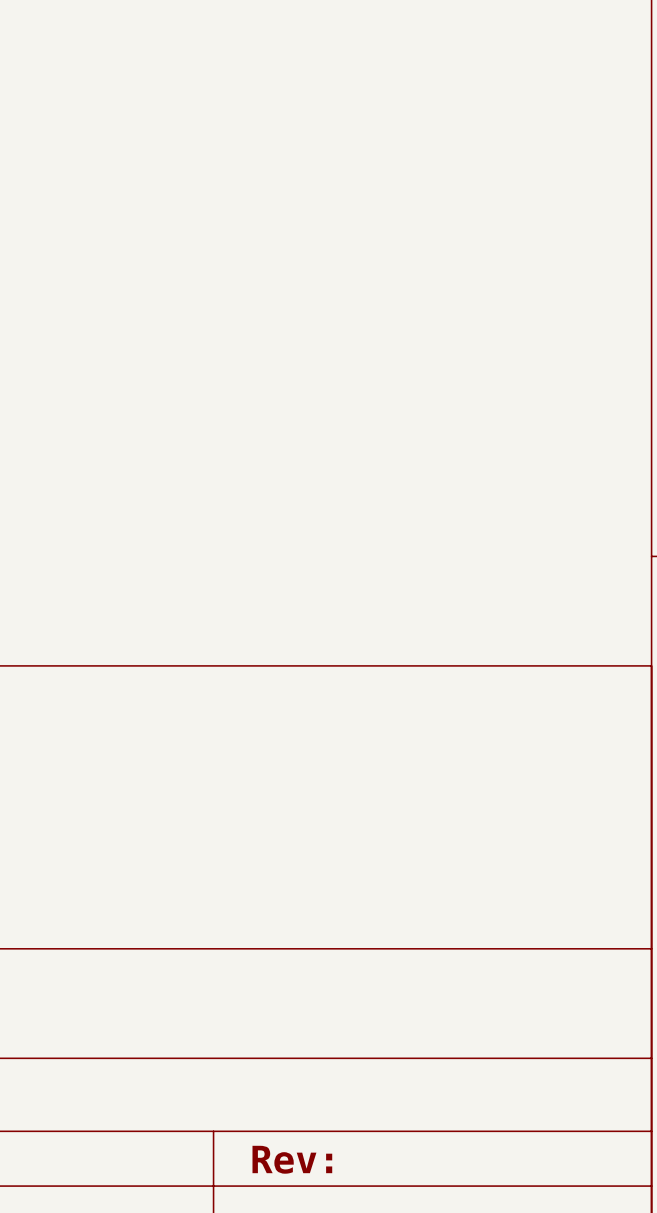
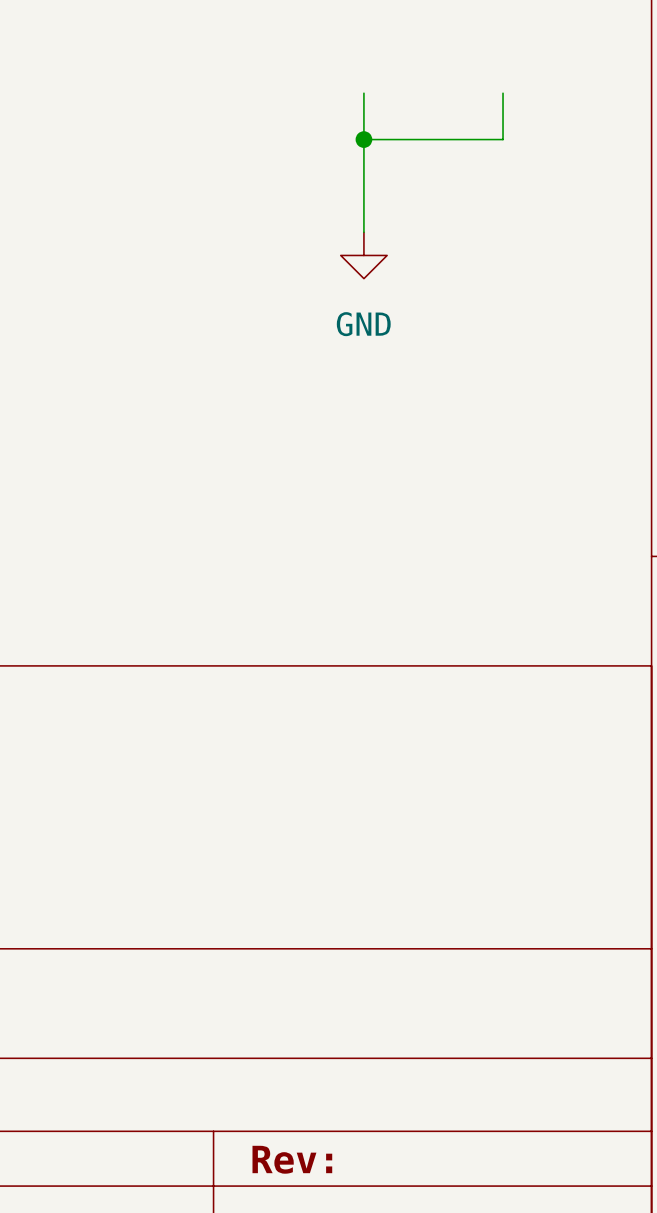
wire: none -> (363, 93) (363, 232)
wire: none -> (503, 93) (503, 139) (363, 139)
junction: none -> (363, 139)
power symbol: none -> GND (363, 255)

